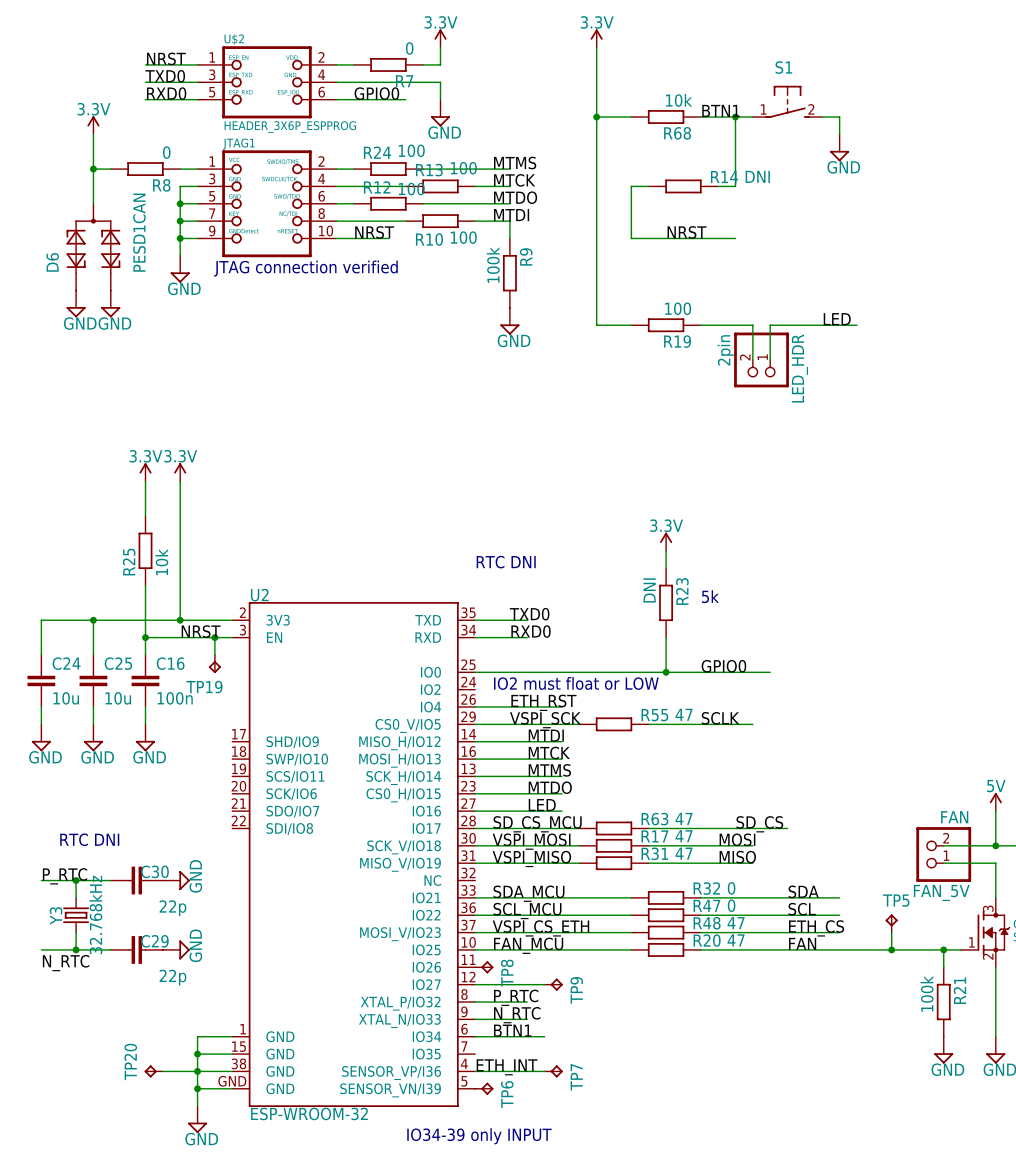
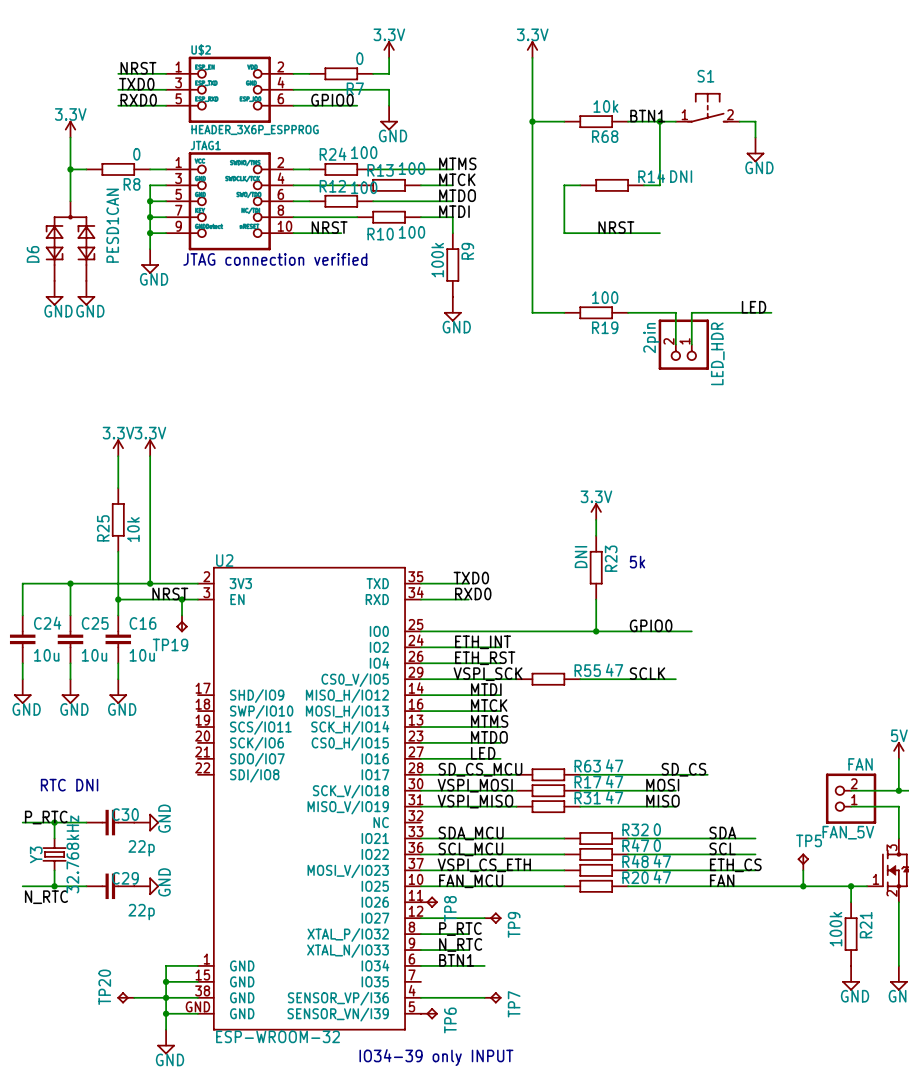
text: RTC DNI (506, 562) -> none
text: IO2 must float or LOW (576, 683) -> none
label: none -> ETH_INT (483, 642)
wire: none -> (420, 647) (500, 647)
C16 value: 100n (175, 698) -> 10u (142, 655)
label: ETH_INT (507, 1067) -> none

